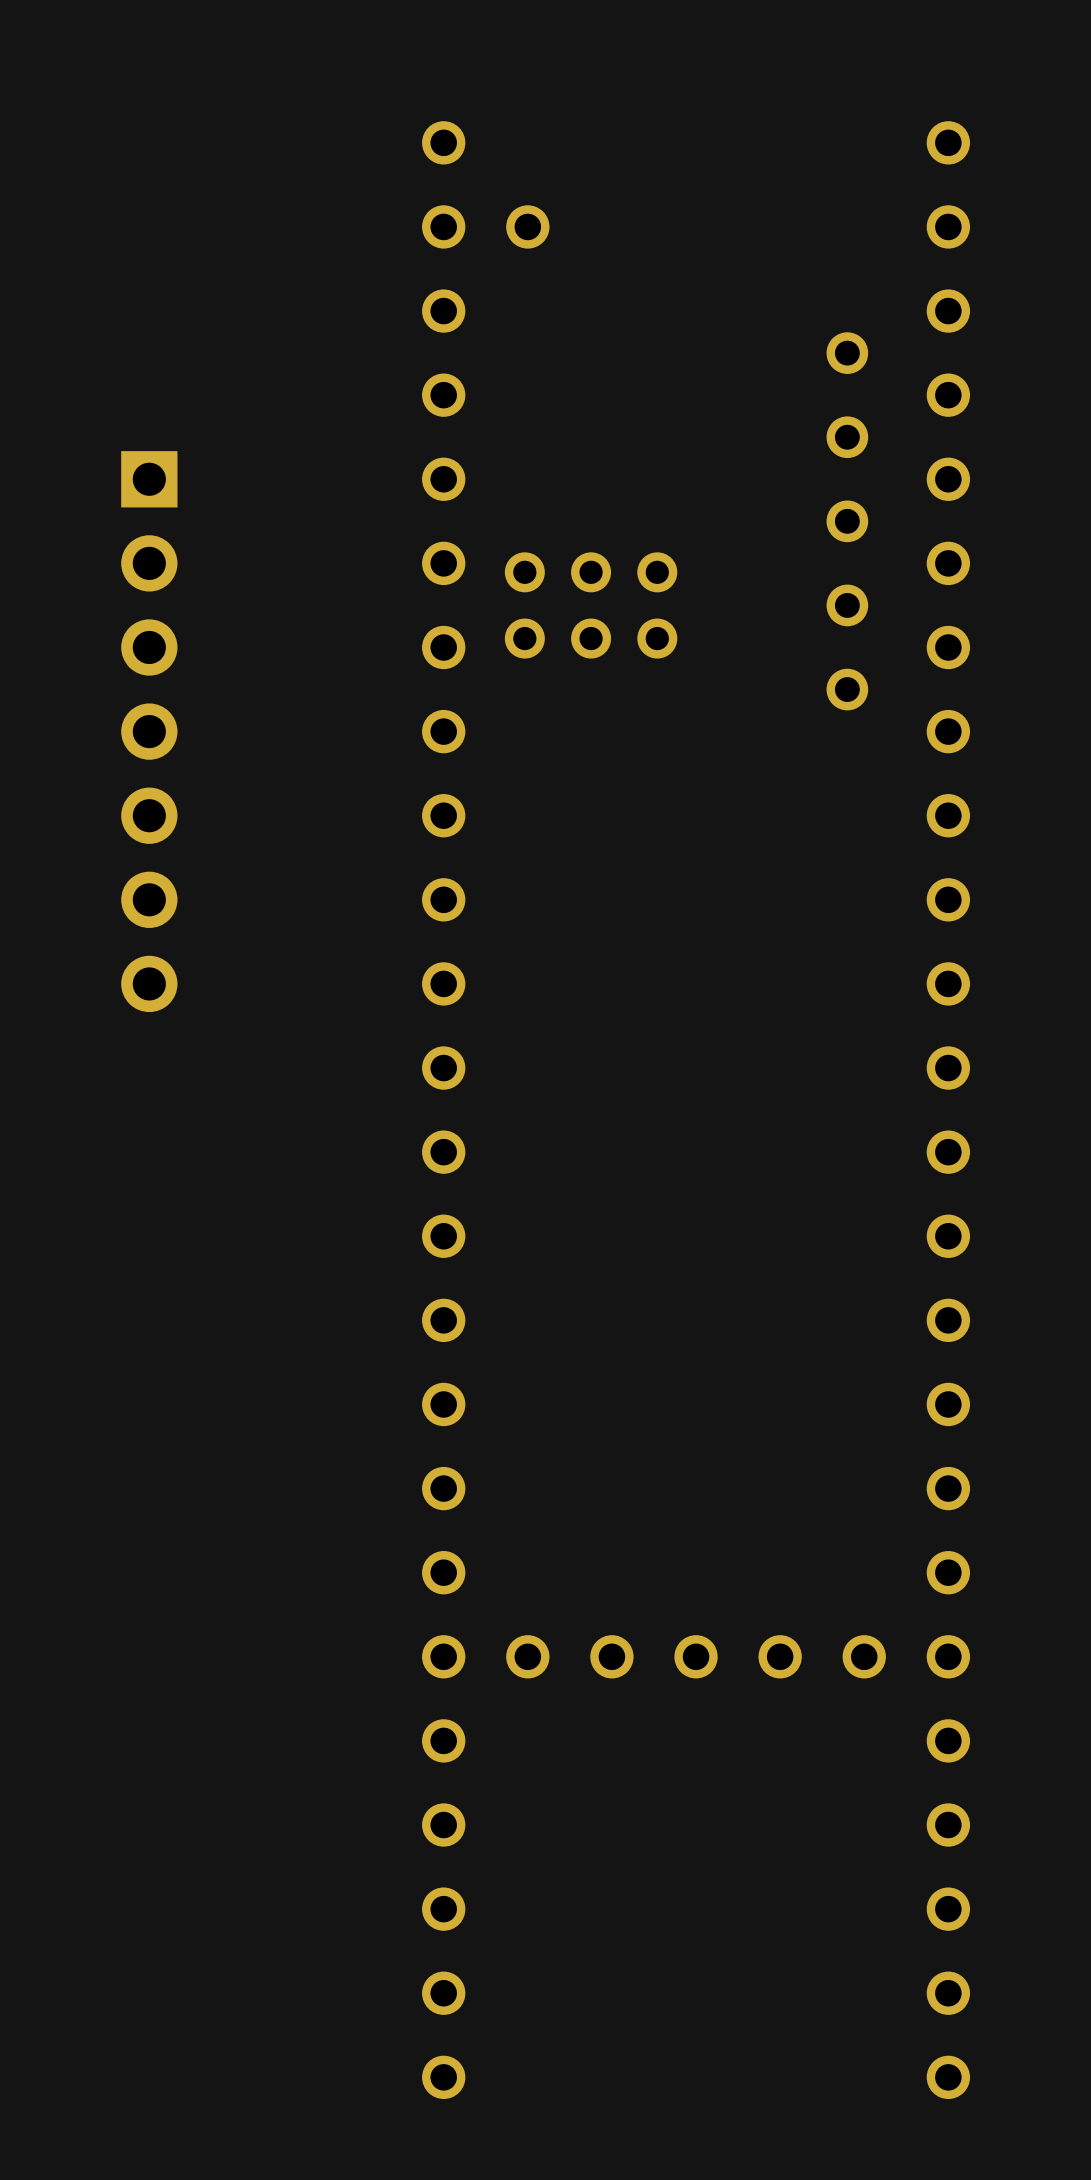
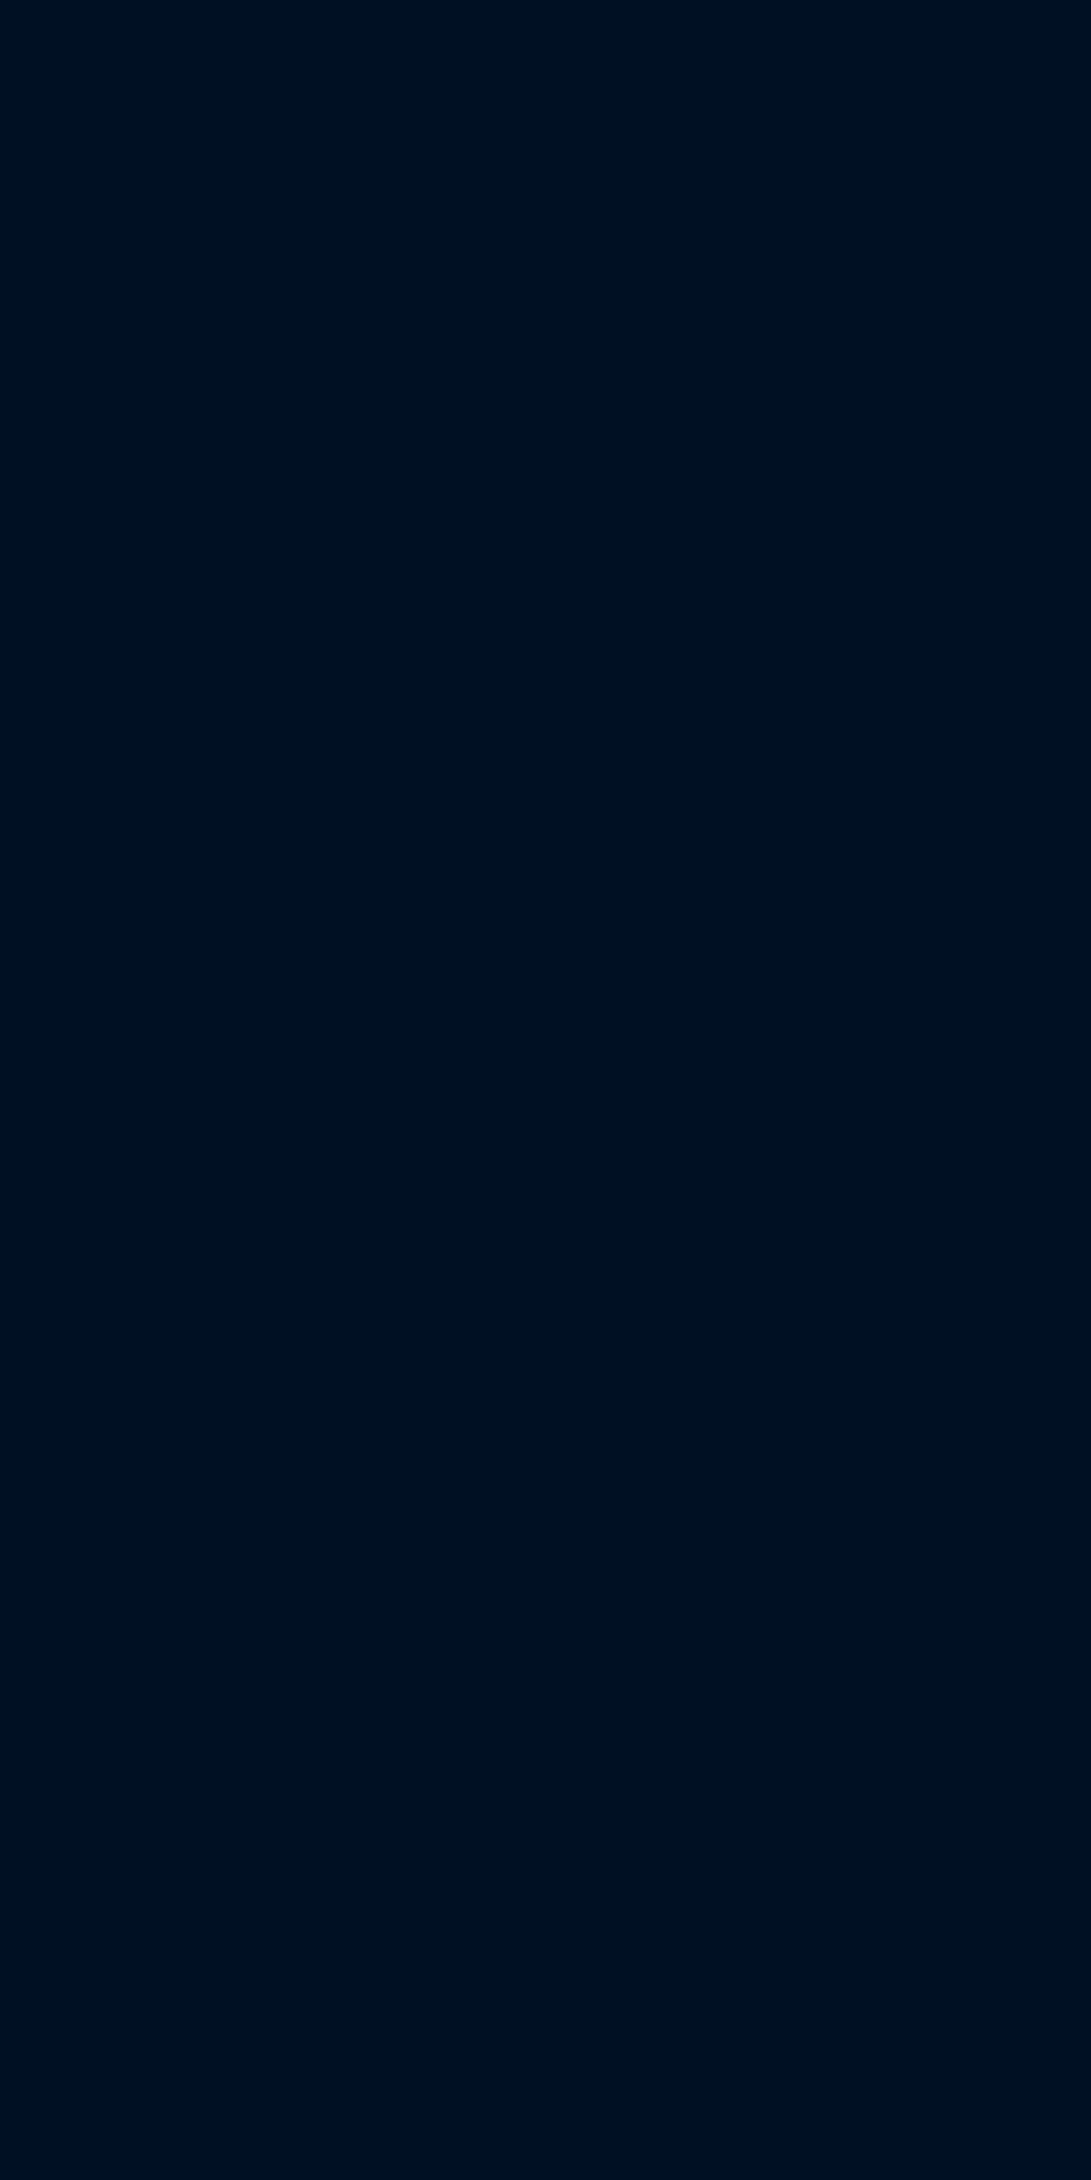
part: (149, 731) -> none
part: (696, 1110) -> none

